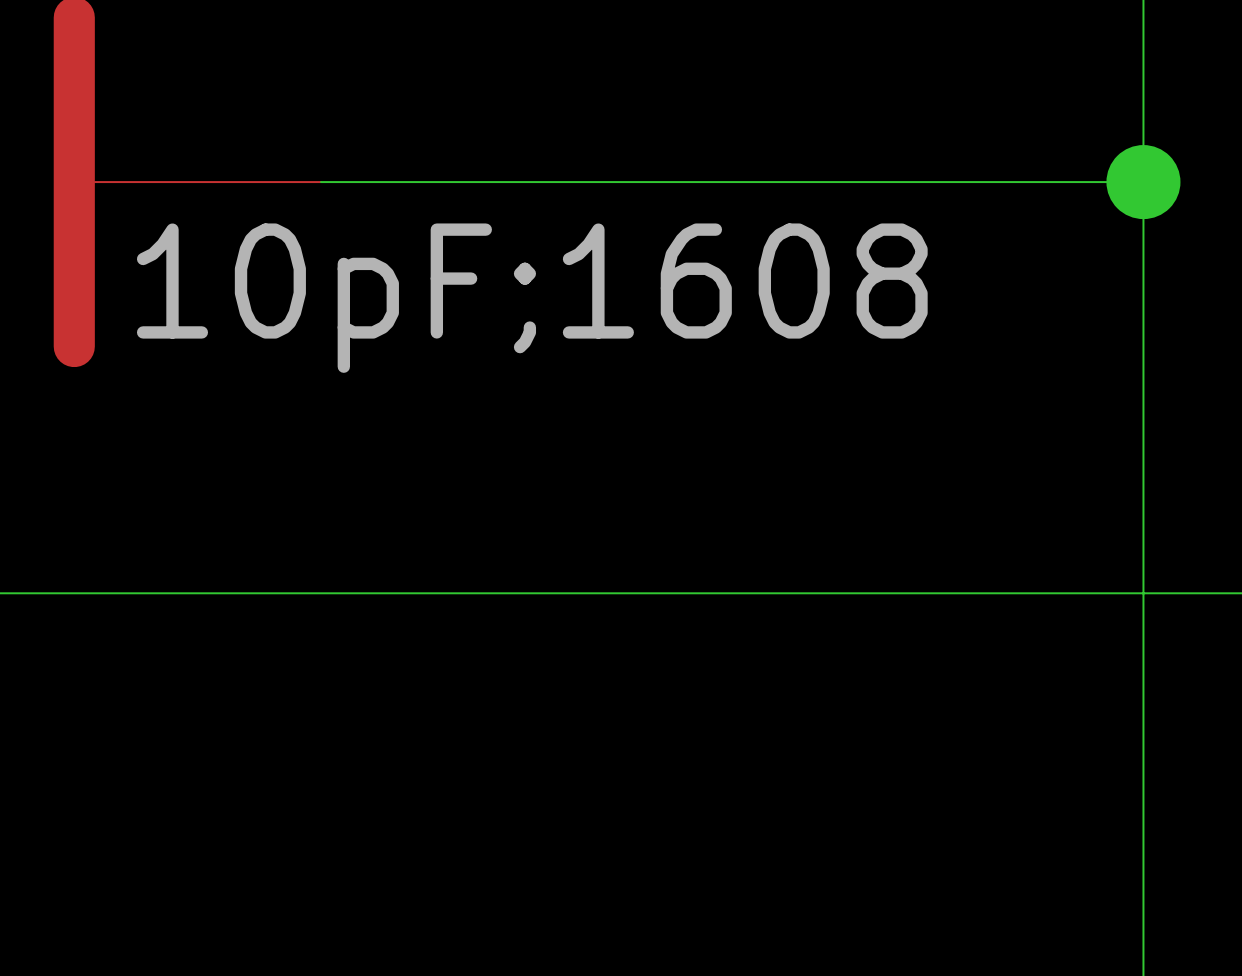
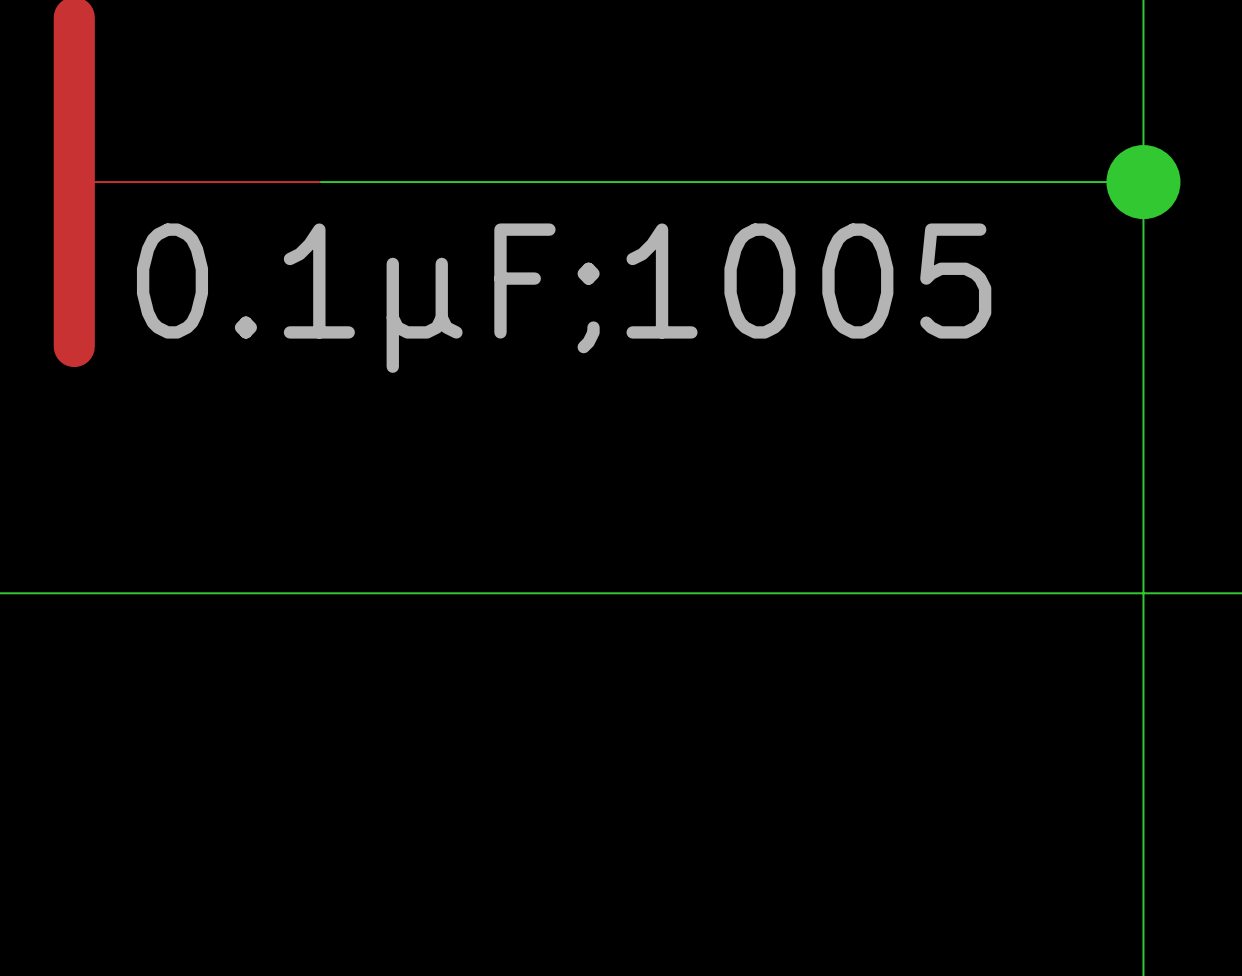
part value: 10pF;1608 (532, 298) -> 0.1µF;1005 (564, 298)

